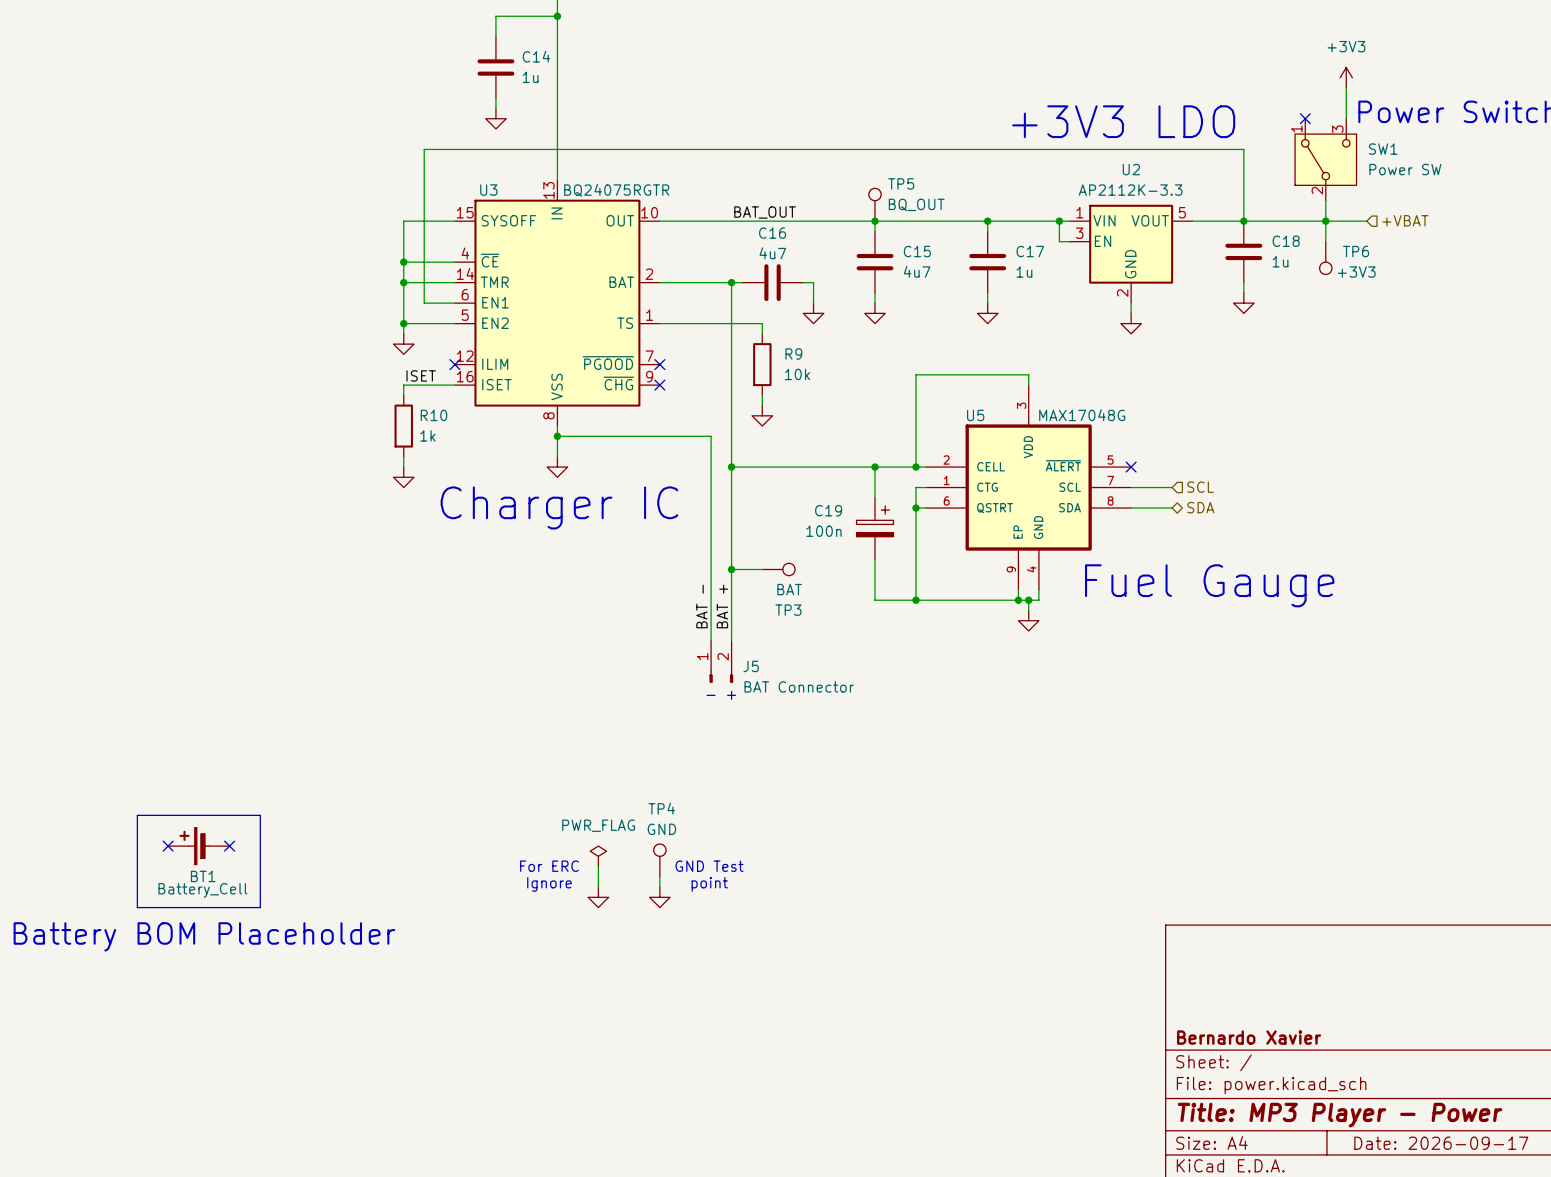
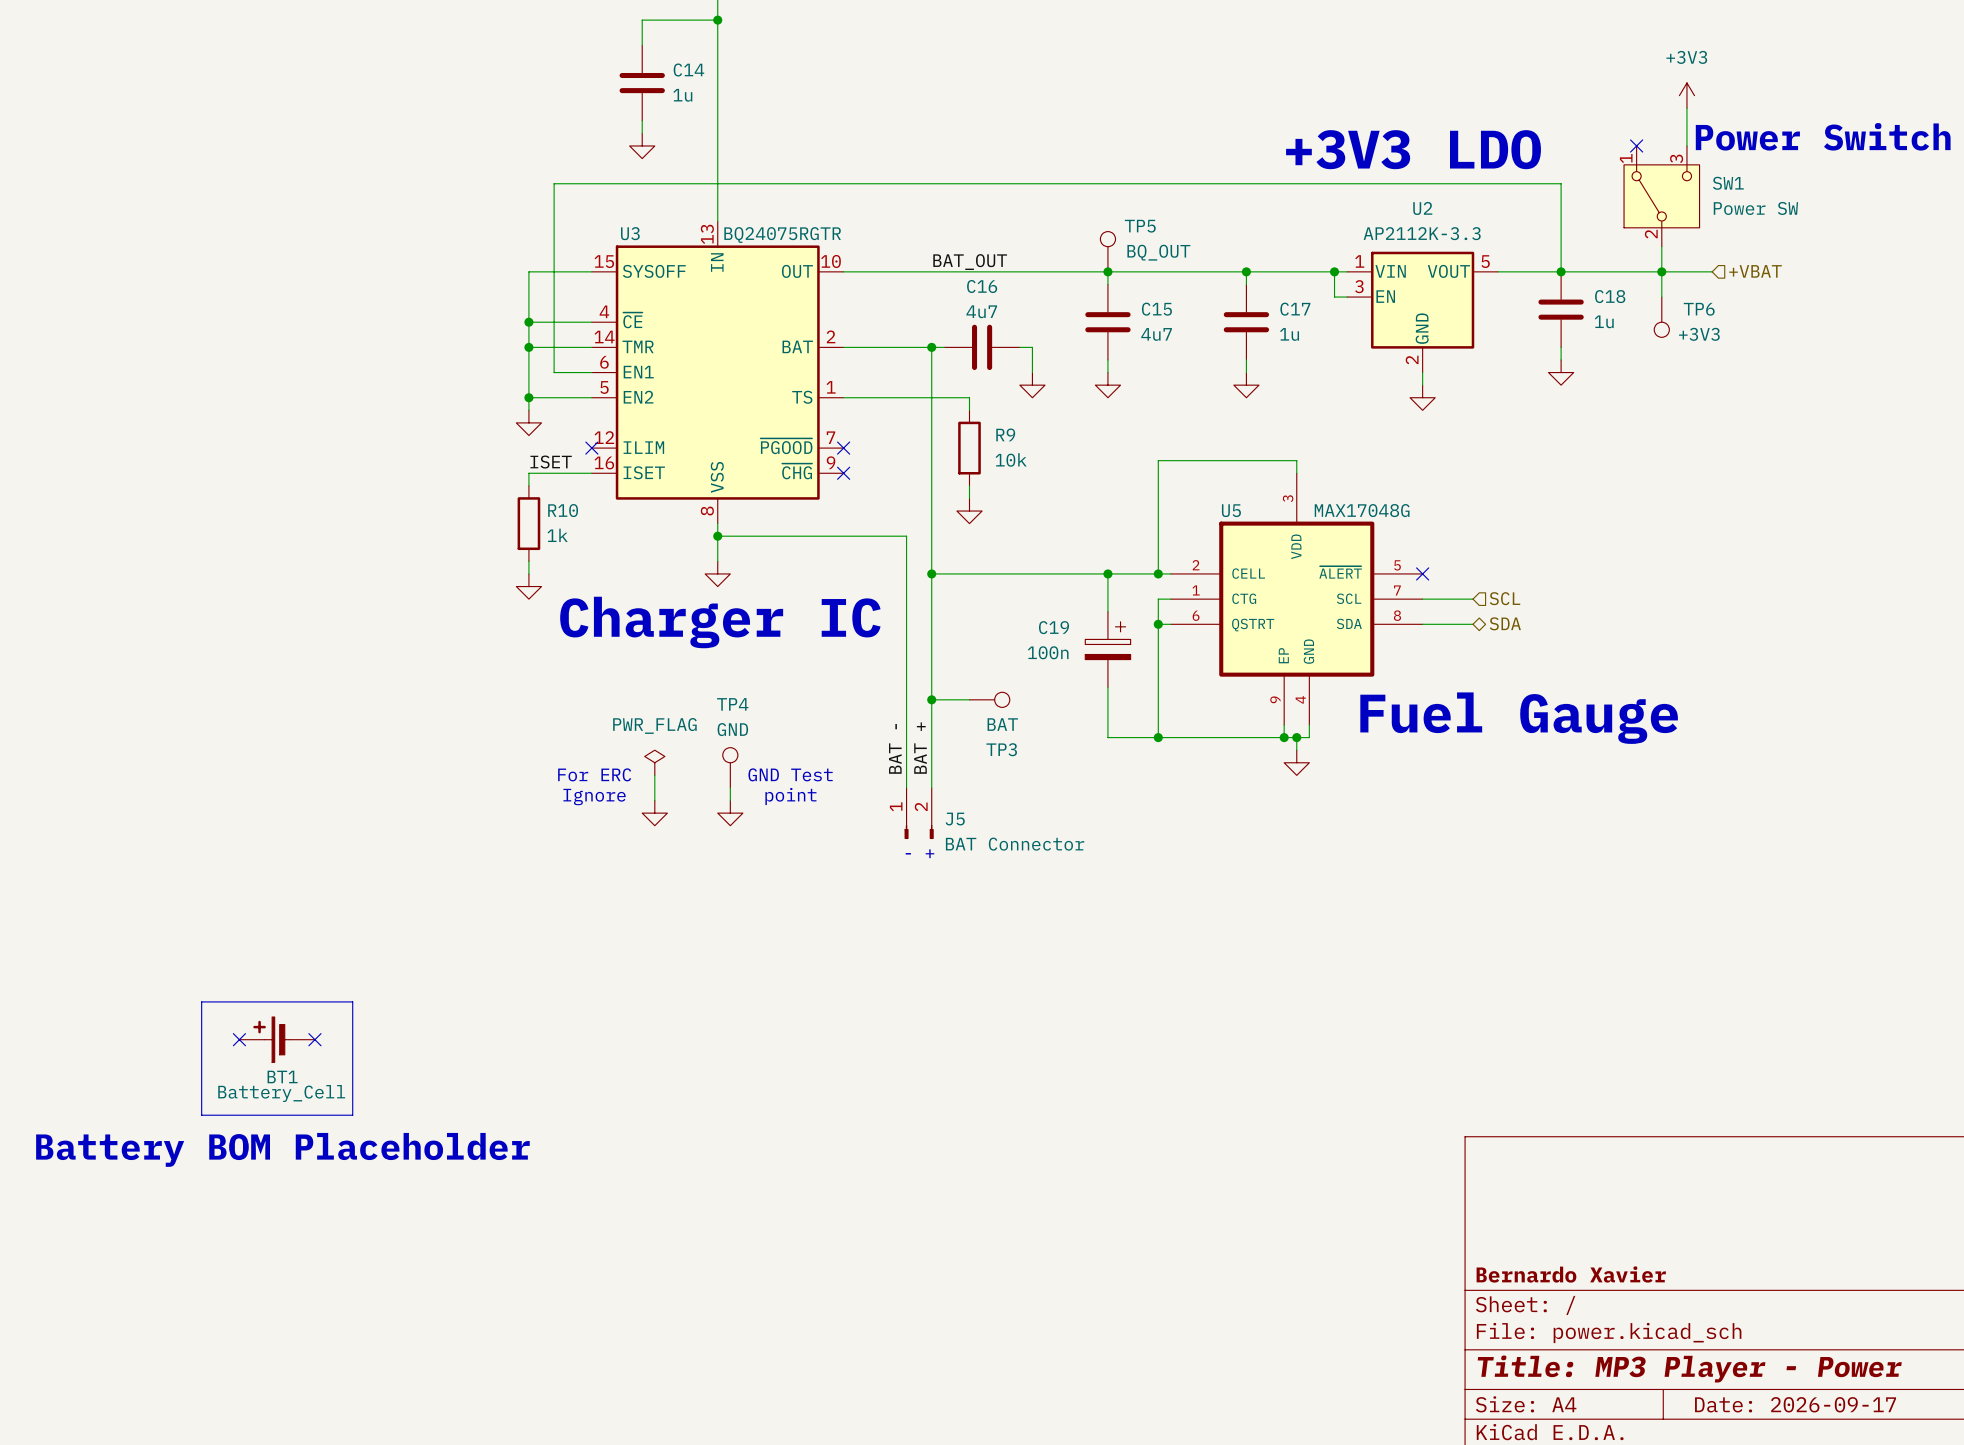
power symbol: none -> PWR_FLAG (654, 762)
text: none -> For ERC (594, 774)
wire: none -> (654, 775) (654, 800)
text: none -> GND Test (790, 774)
wire: none -> (730, 787) (730, 800)
text: none -> Ignore (594, 797)
text: none -> point (790, 796)
power symbol: none -> (654, 813)
power symbol: none -> (730, 813)
power symbol: PWR_FLAG (598, 856) -> none
TP4 position: (659, 860) -> (730, 767)
text: For ERC (549, 866) -> none
wire: (598, 866) (598, 887) -> none
text: GND Test (709, 866) -> none
wire: (659, 876) (659, 887) -> none
text: Ignore (549, 884) -> none
text: point (709, 884) -> none
power symbol: (598, 897) -> none
power symbol: (659, 897) -> none

